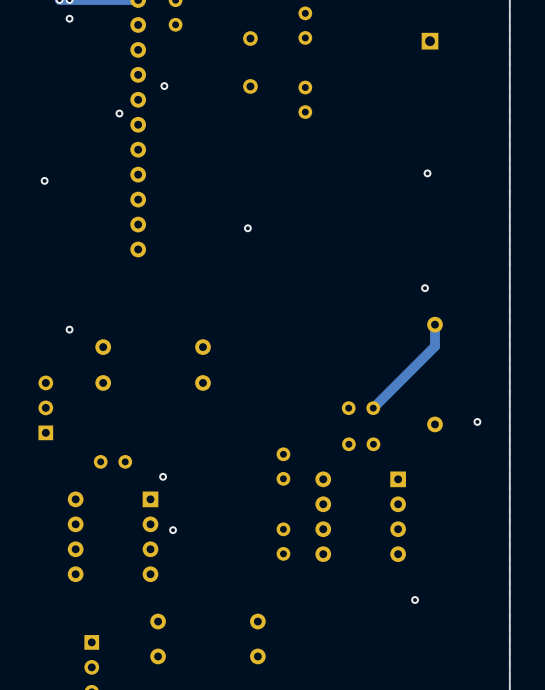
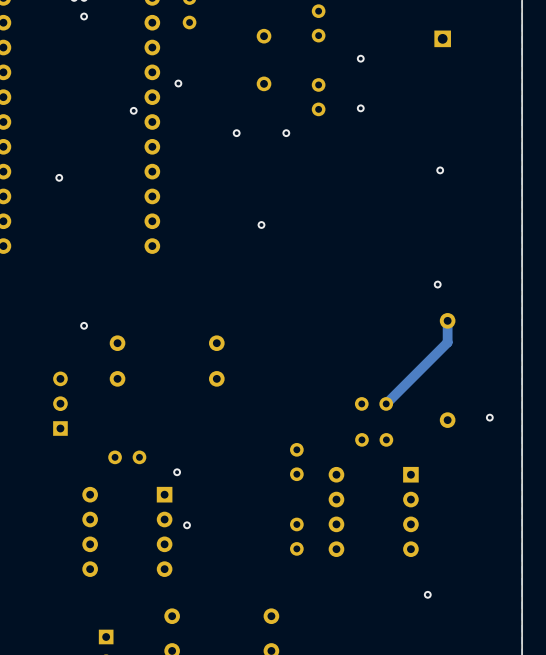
via: none -> (360, 58)
via: none -> (360, 108)
via: none -> (236, 133)
via: none -> (286, 133)

